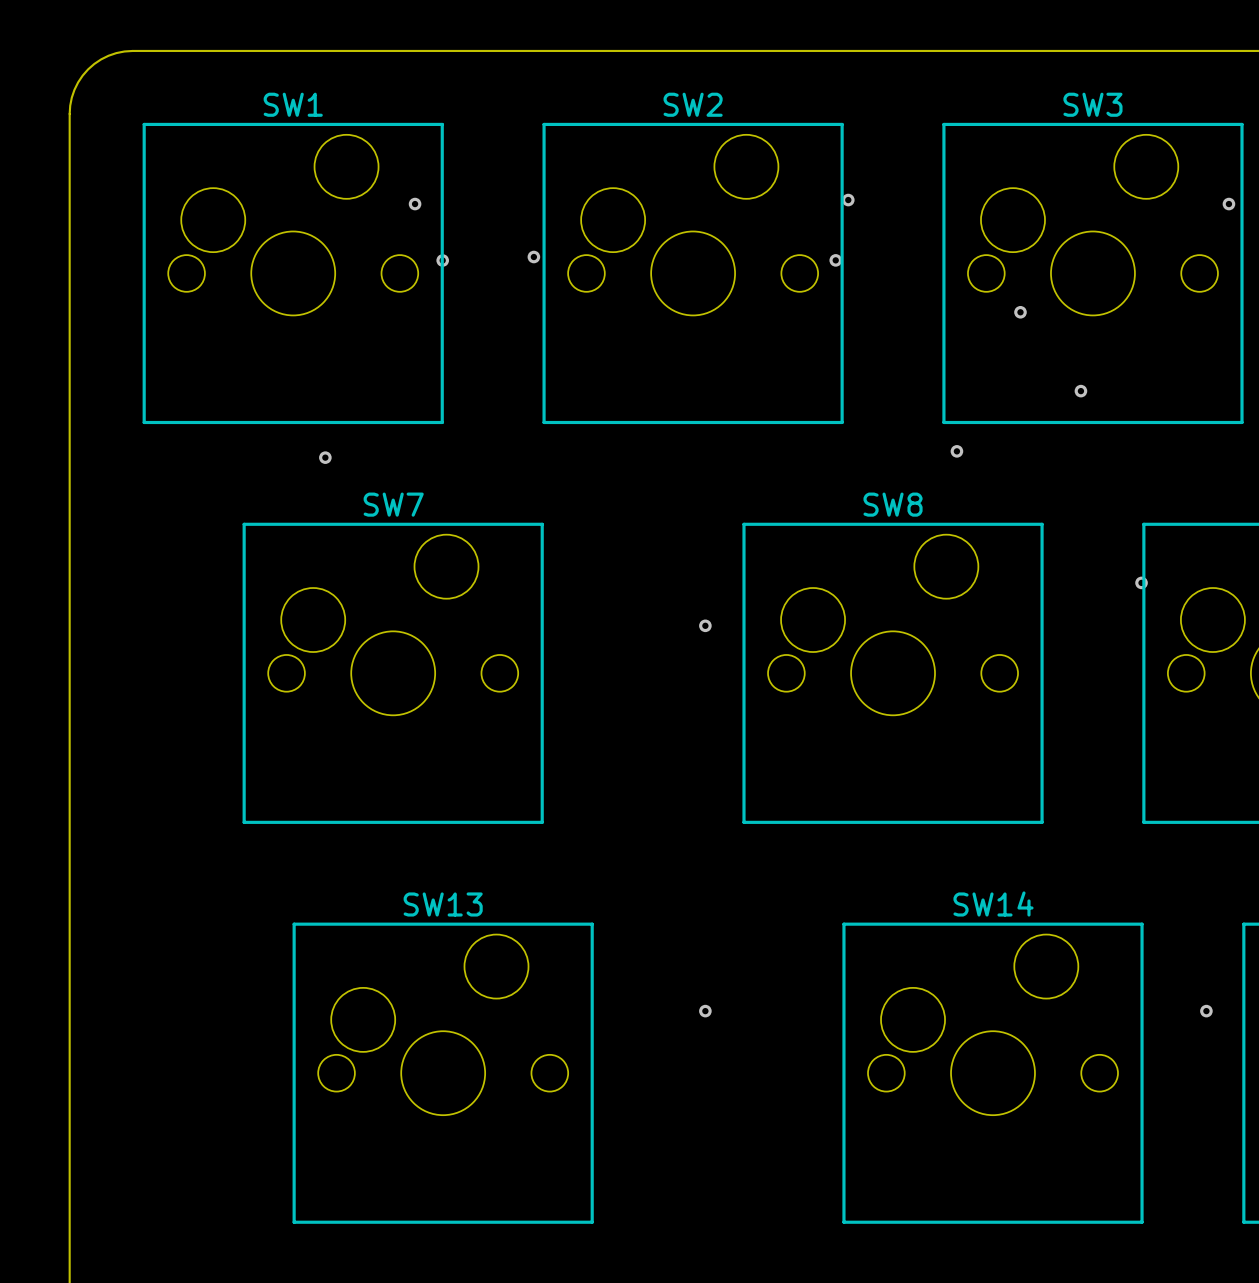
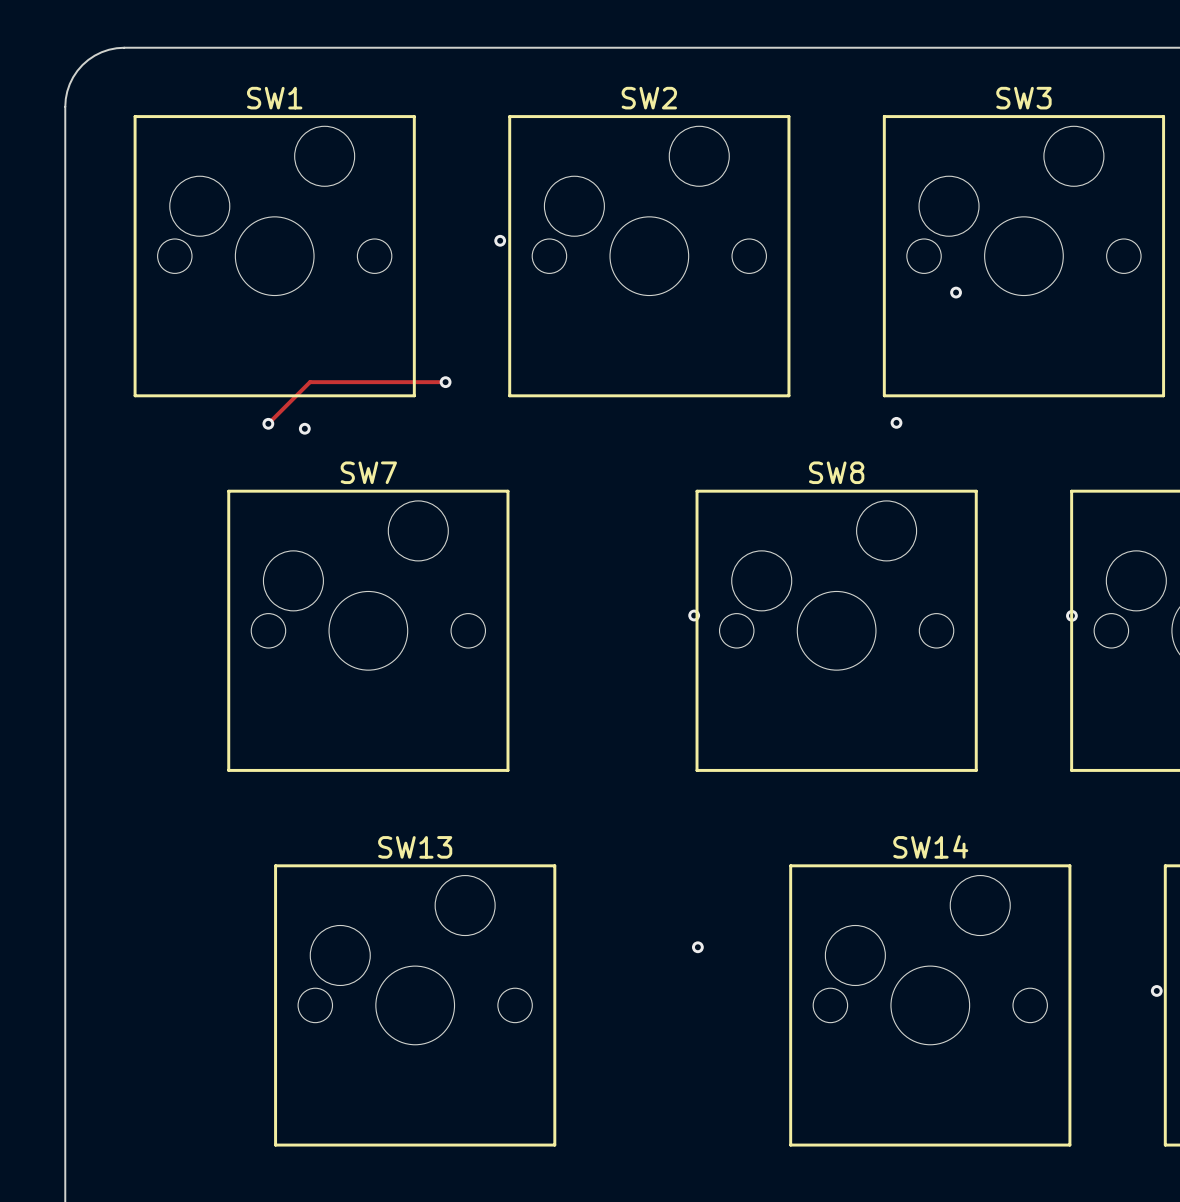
via: (848, 200) -> none
via: (415, 204) -> none
via: (1228, 204) -> none
via: (442, 260) -> none
via: (835, 260) -> none
via: (1080, 391) -> none
track: none -> (445, 382) (310, 382) (268, 423)
via: none -> (445, 382)
via: none -> (268, 423)
via position: (1141, 582) -> (1071, 615)
via position: (705, 625) -> (694, 615)
via position: (705, 1011) -> (697, 947)
via position: (1206, 1011) -> (1156, 990)

